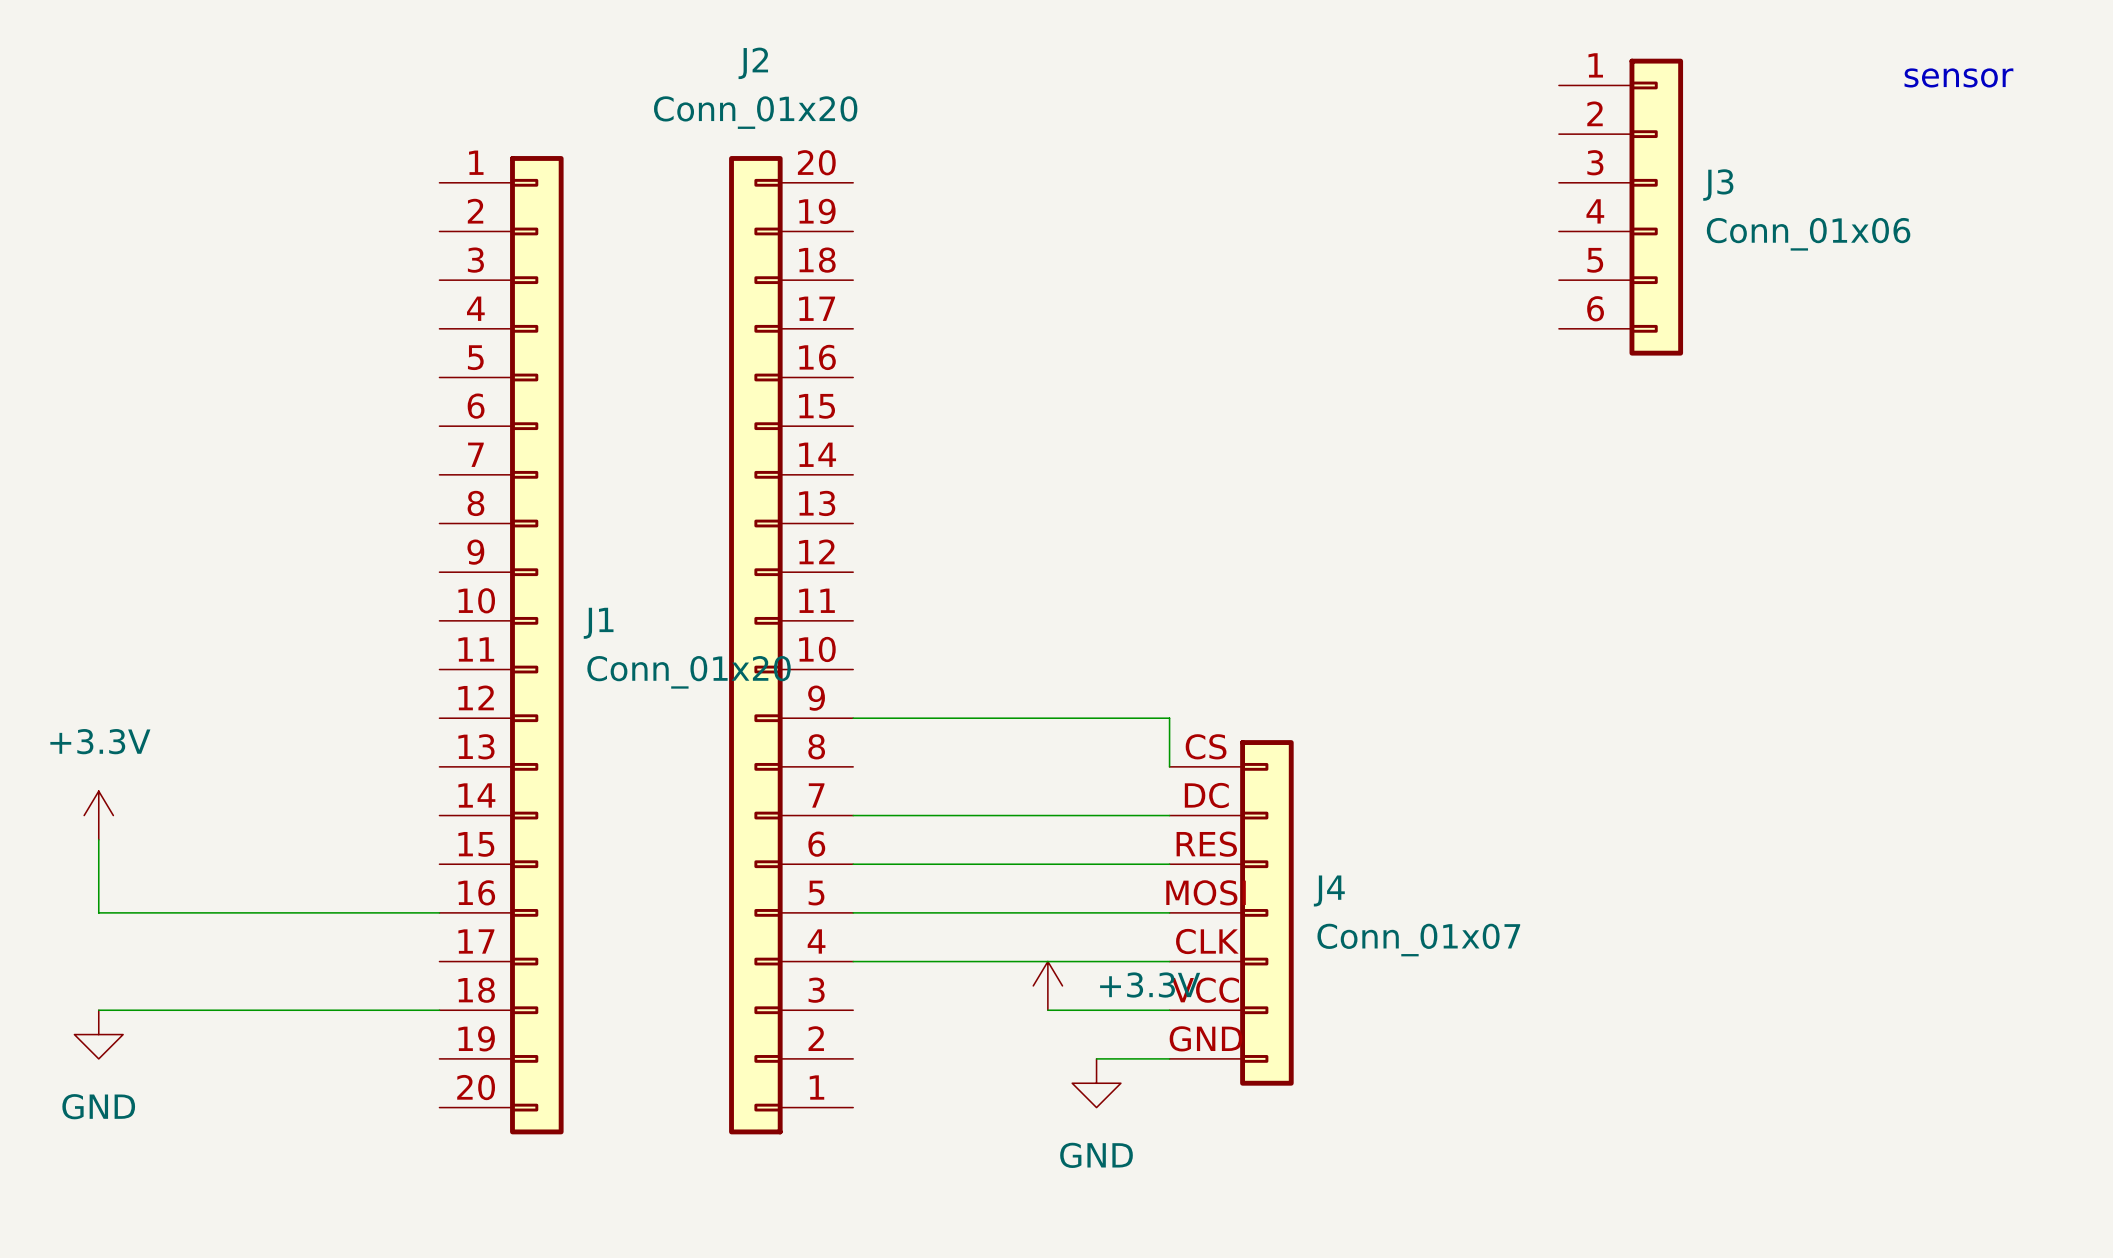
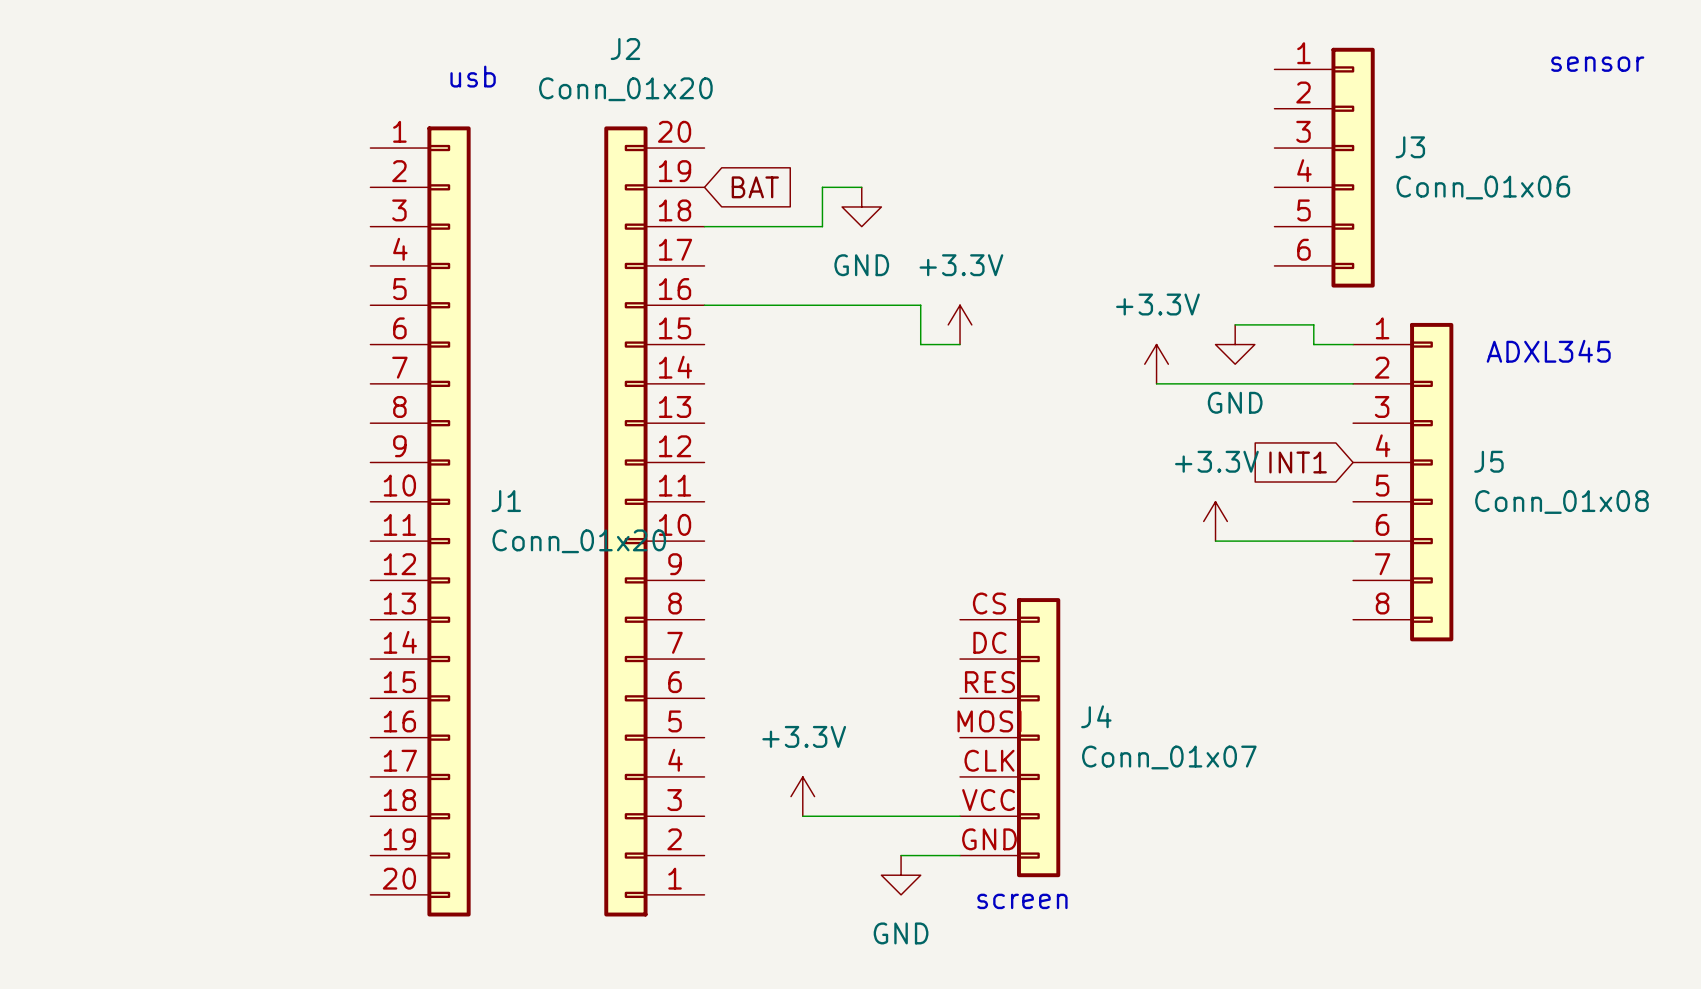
text: none -> usb (473, 76)
global label: none -> BAT (755, 187)
wire: none -> (861, 187) (822, 187) (822, 226) (704, 226)
power symbol: none -> GND (861, 206)
wire: none -> (704, 305) (920, 305) (920, 344) (960, 344)
power symbol: none -> +3.3V (960, 324)
wire: none -> (1235, 324) (1313, 324) (1313, 344) (1353, 344)
power symbol: none -> GND (1235, 344)
text: none -> ADXL345 (1548, 351)
power symbol: none -> +3.3V (1156, 364)
wire: none -> (1156, 383) (1353, 383)
global label: none -> INT1 (1298, 462)
J5: none -> Conn_01x08 (1403, 482)
power symbol: none -> +3.3V (1215, 521)
wire: none -> (1215, 541) (1353, 541)
wire: (853, 718) (1169, 718) (1169, 766) -> none
power symbol: +3.3V (98, 815) -> none
wire: (853, 815) (1169, 815) -> none
wire: (98, 839) (98, 912) (439, 912) -> none
wire: (853, 864) (1169, 864) -> none
wire: (853, 912) (1169, 912) -> none
wire: (853, 961) (1169, 961) -> none
power symbol position: +3.3V (1047, 985) -> +3.3V (802, 796)
power symbol text position: +3.3V (1150, 985) -> +3.3V (804, 736)
wire: (98, 1010) (439, 1010) -> none
wire: none -> (802, 816) (861, 816)
power symbol: GND (98, 1034) -> none
text: none -> screen (1022, 901)

